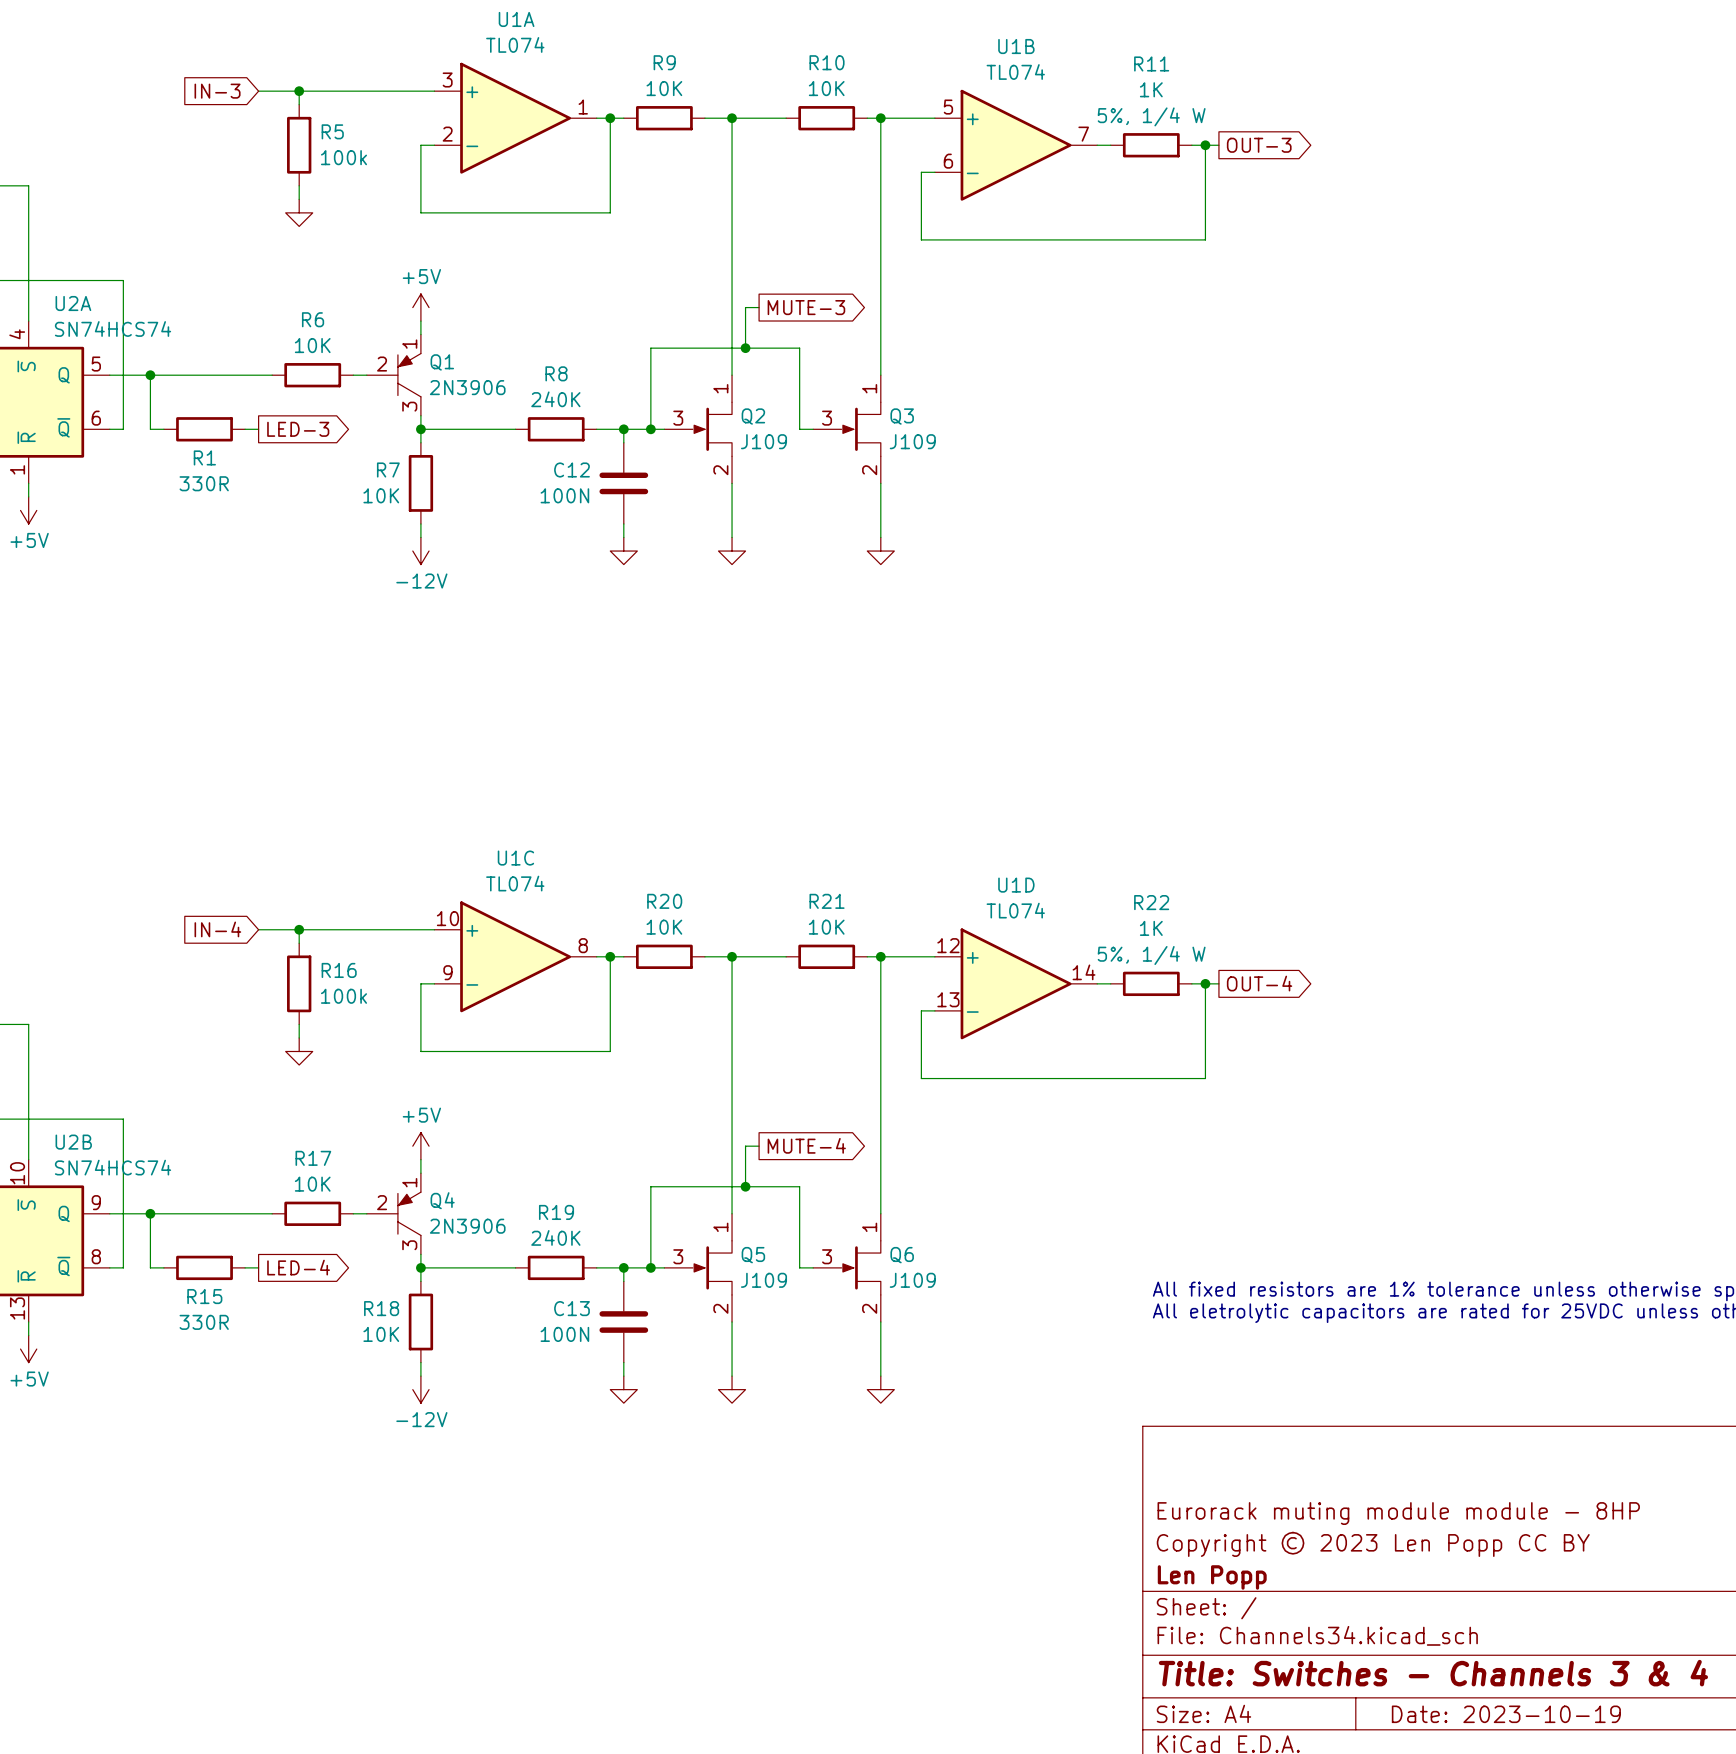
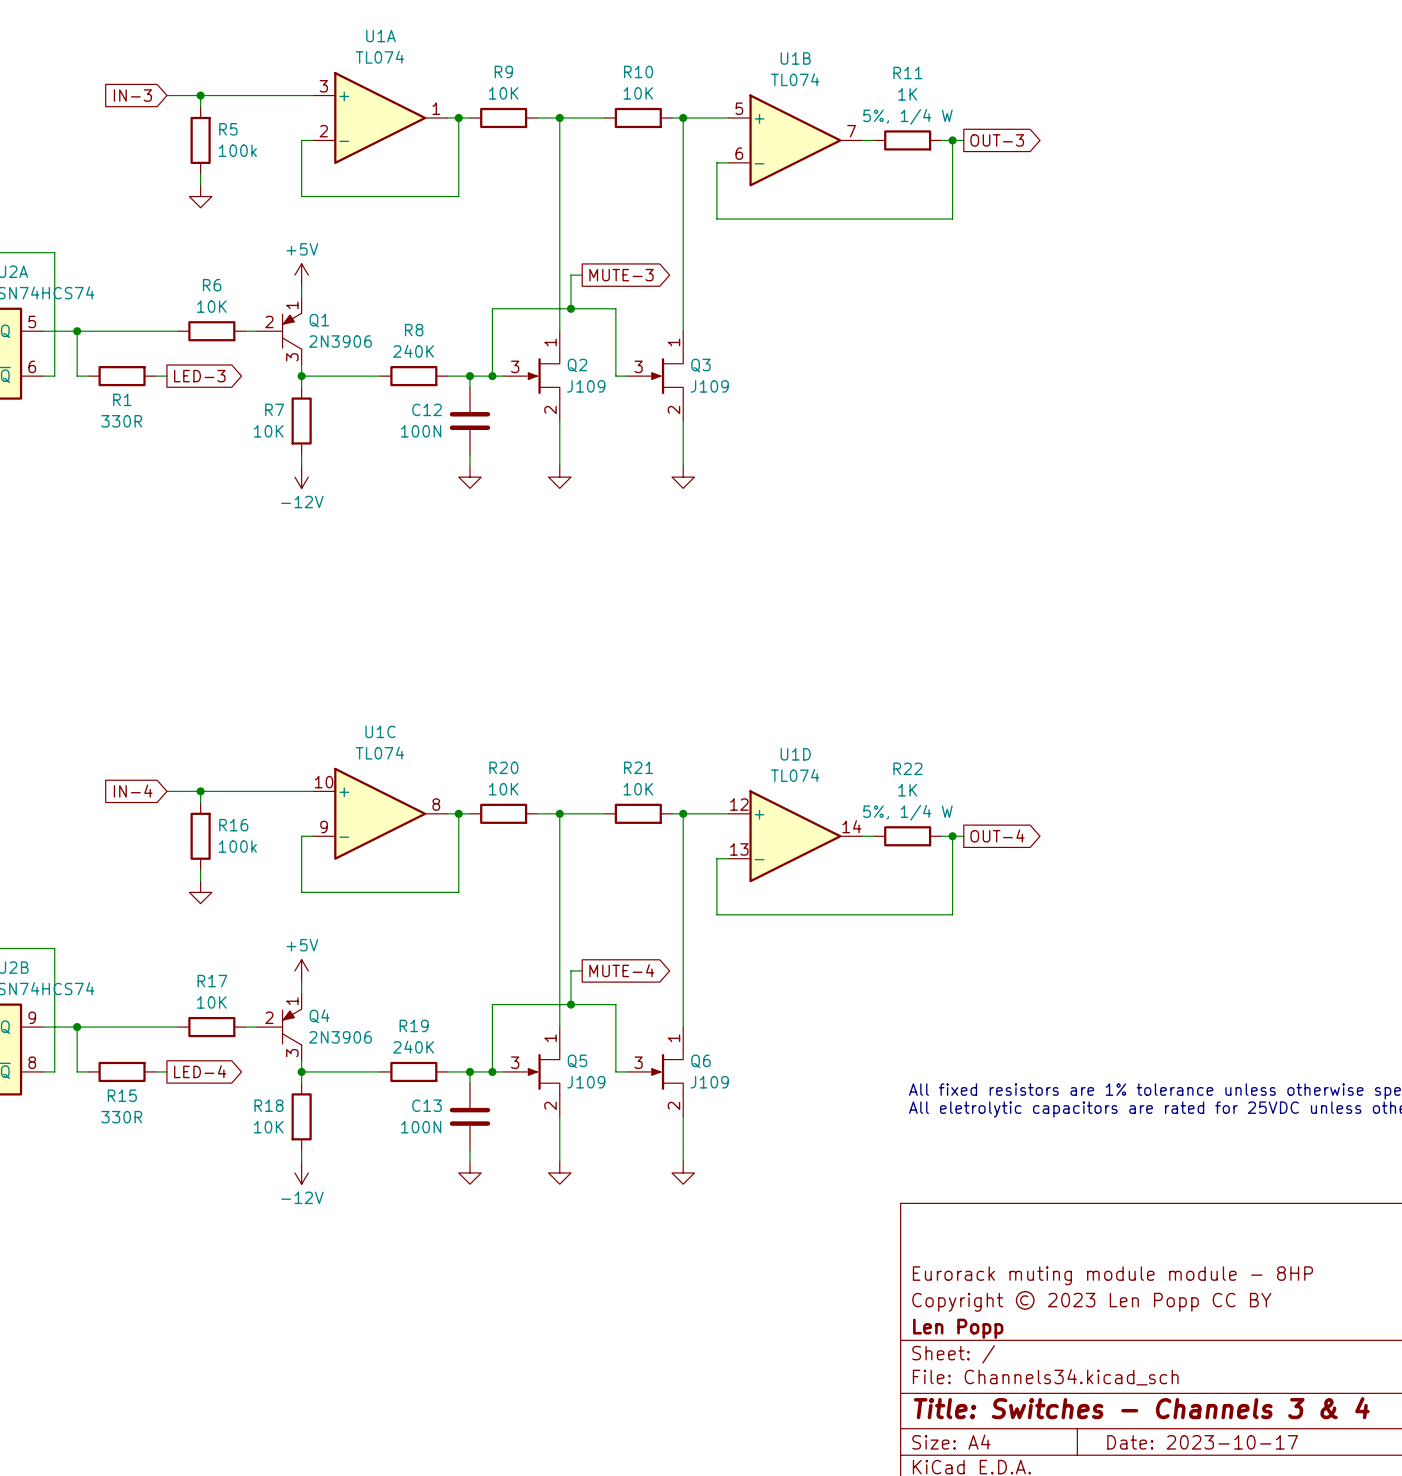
title block: Date: 2023-10-19 (1506, 1714) -> Date: 2023-10-17 (1202, 1442)

